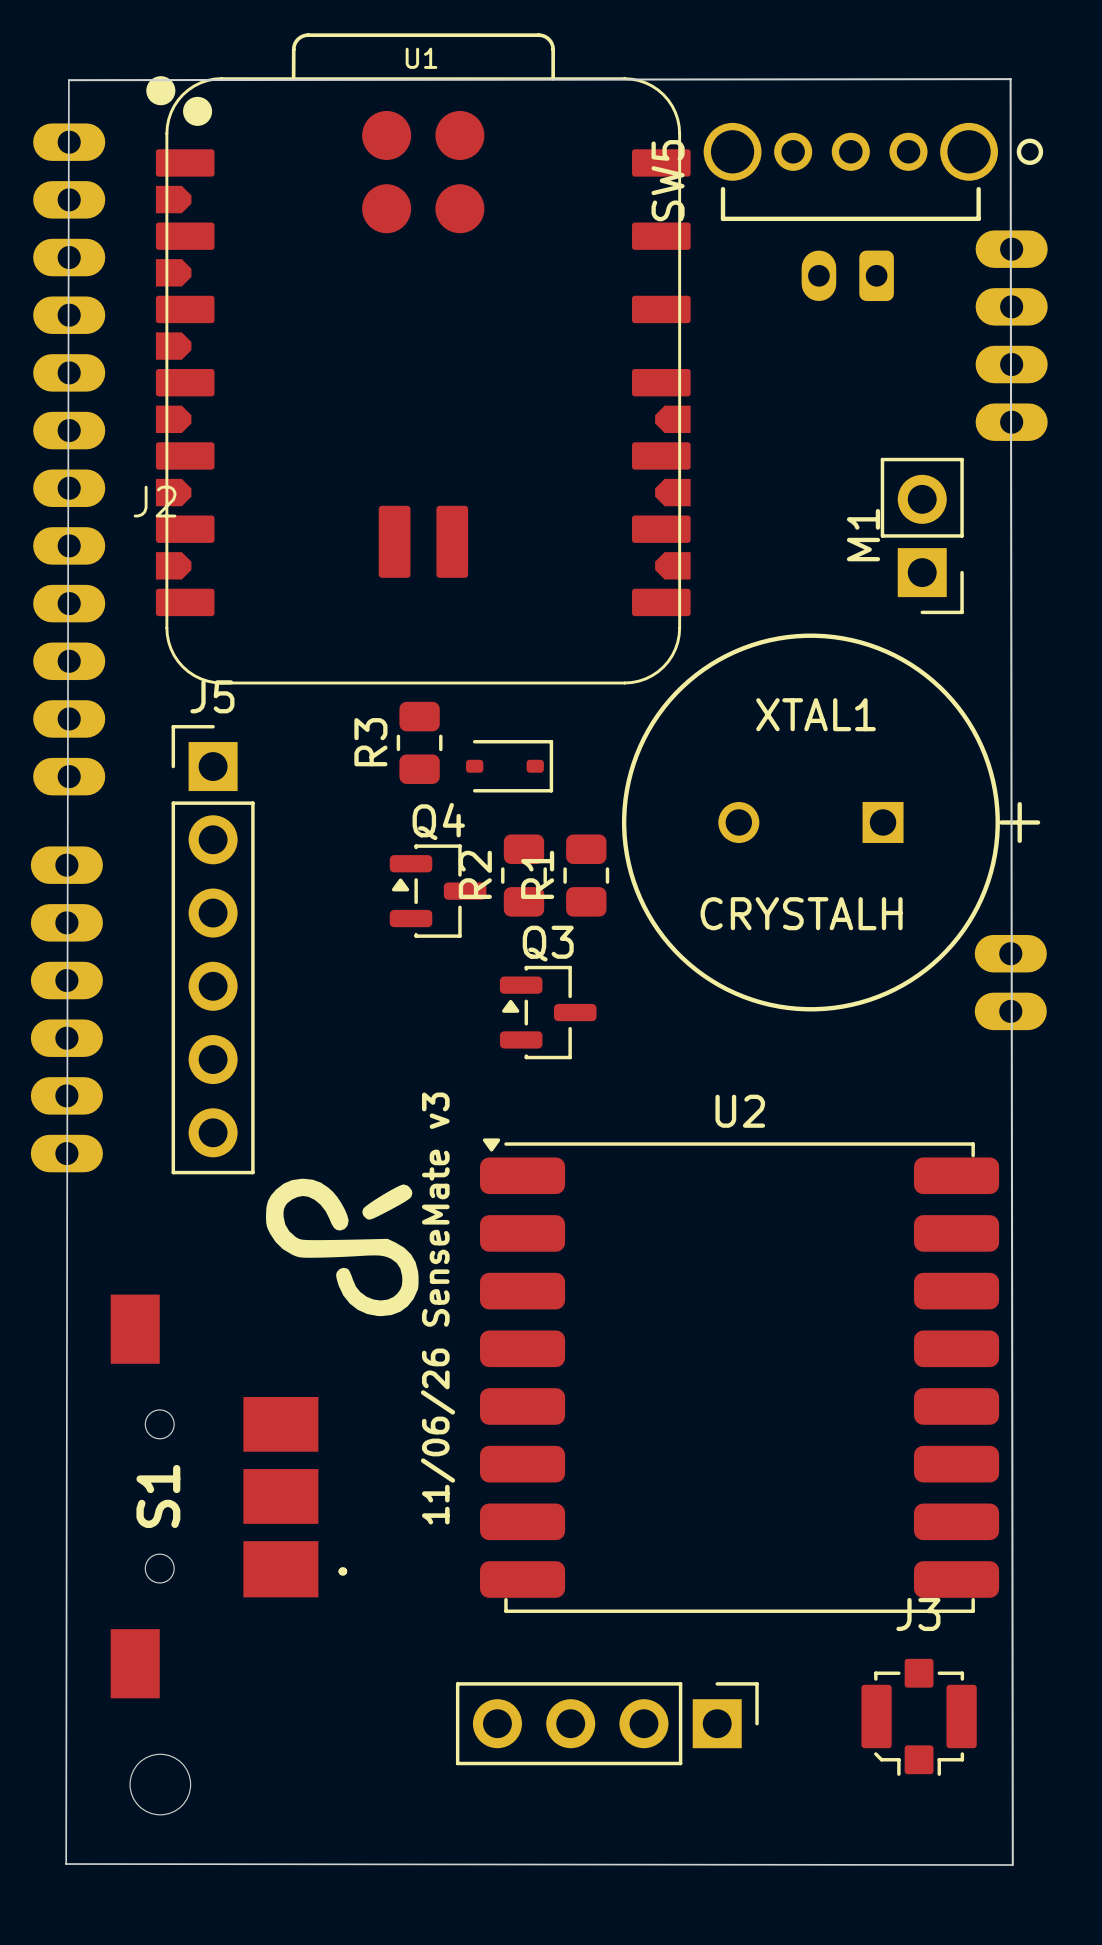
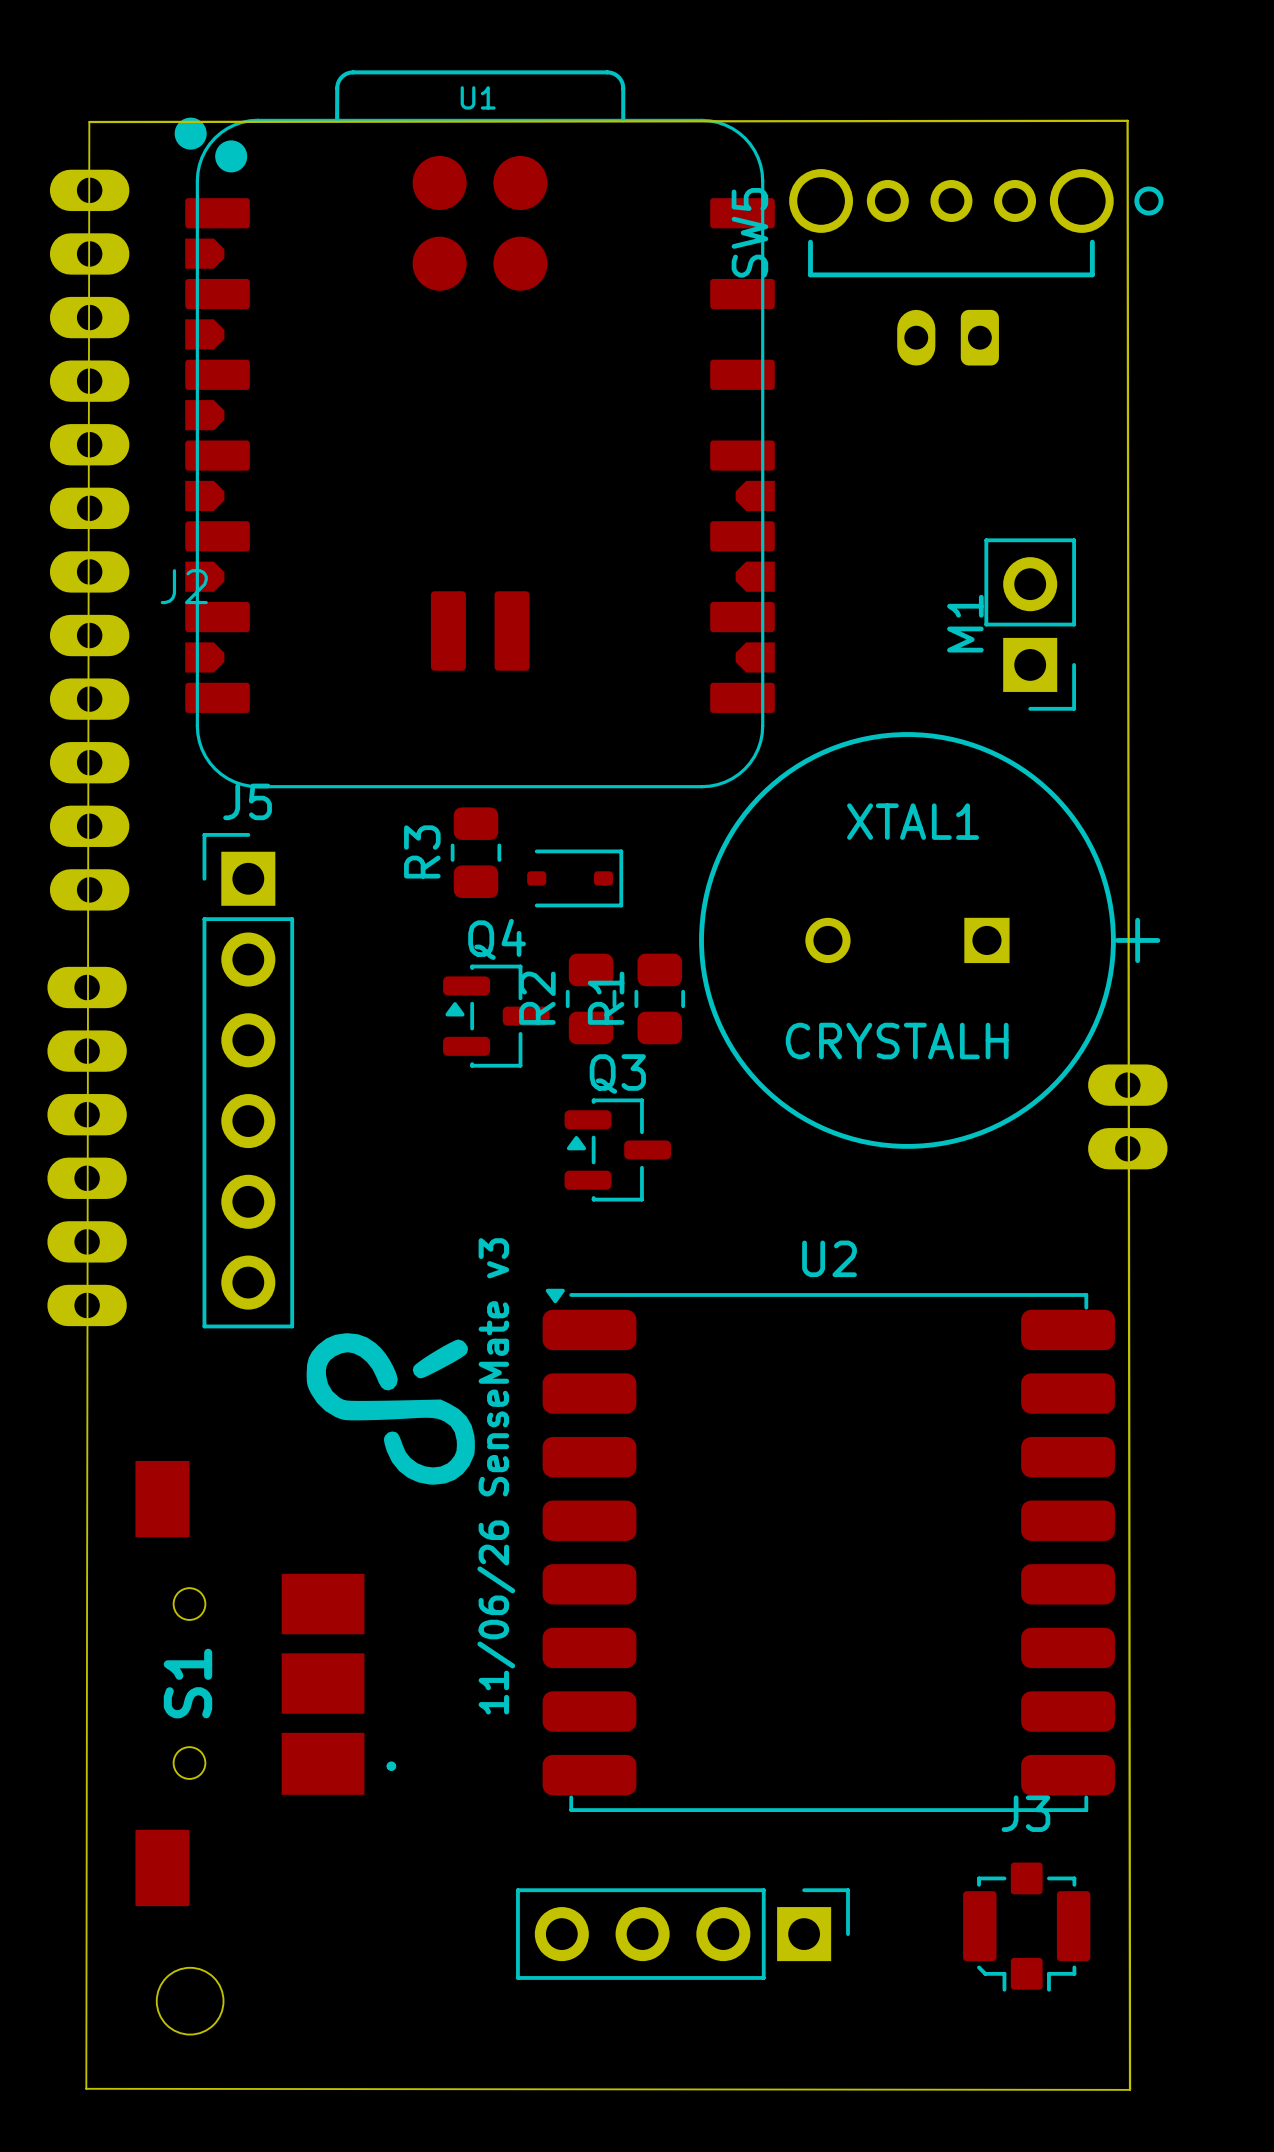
part: (1011, 335) -> none

